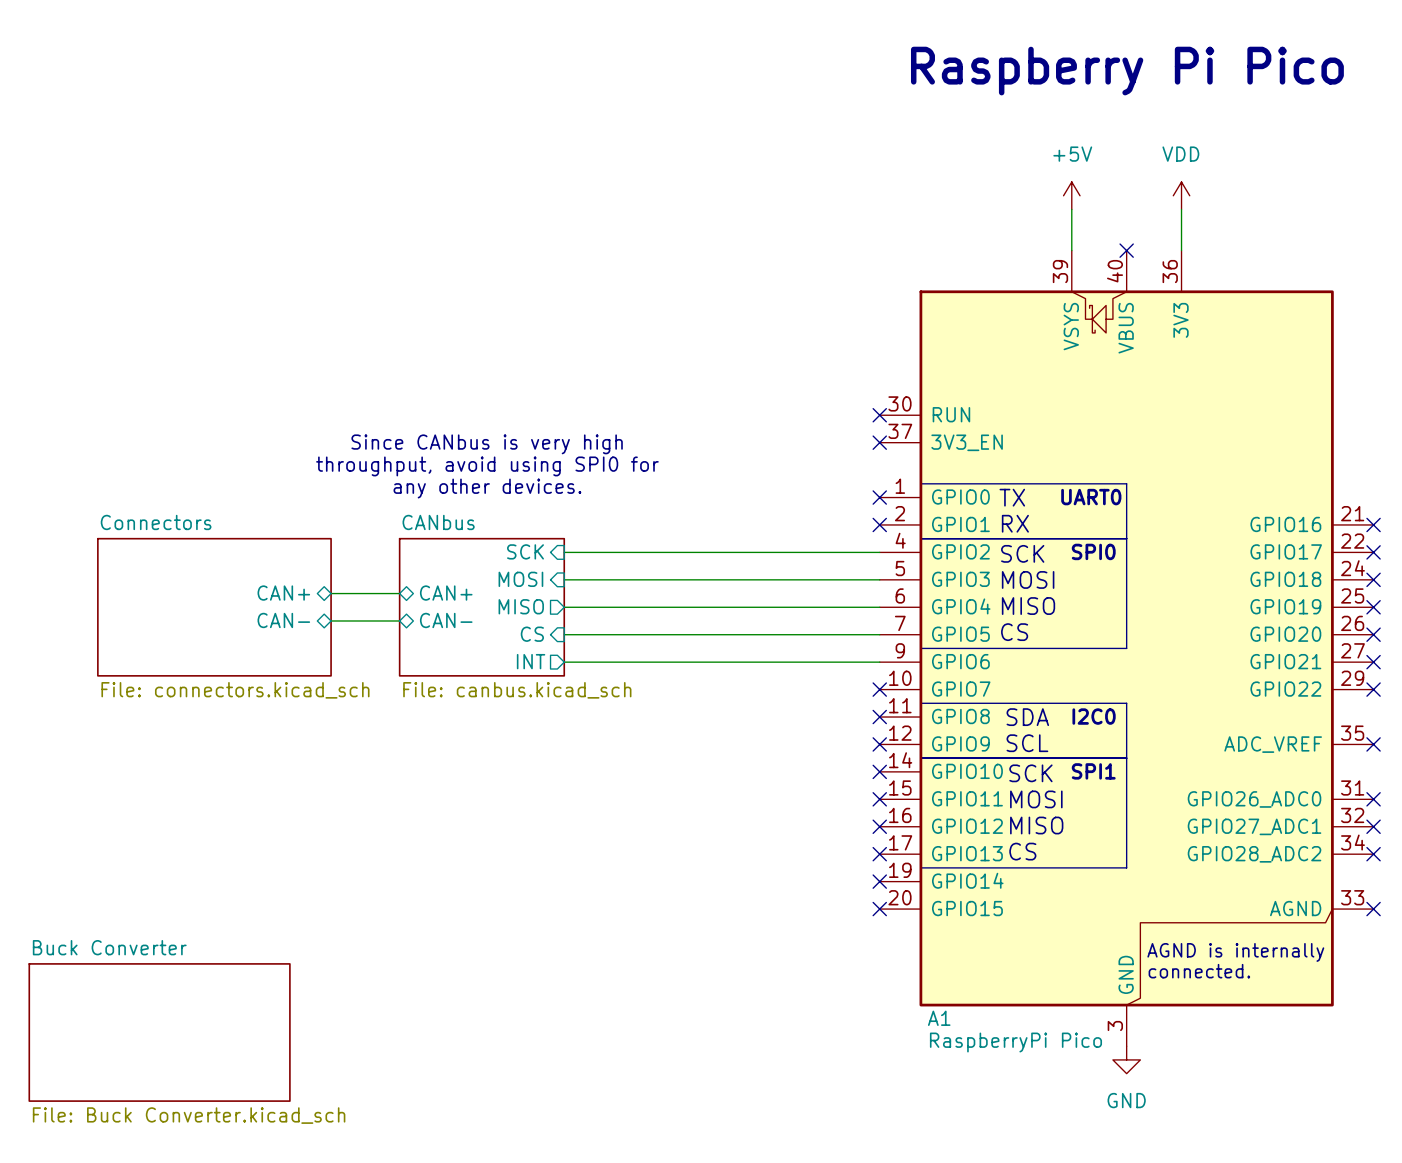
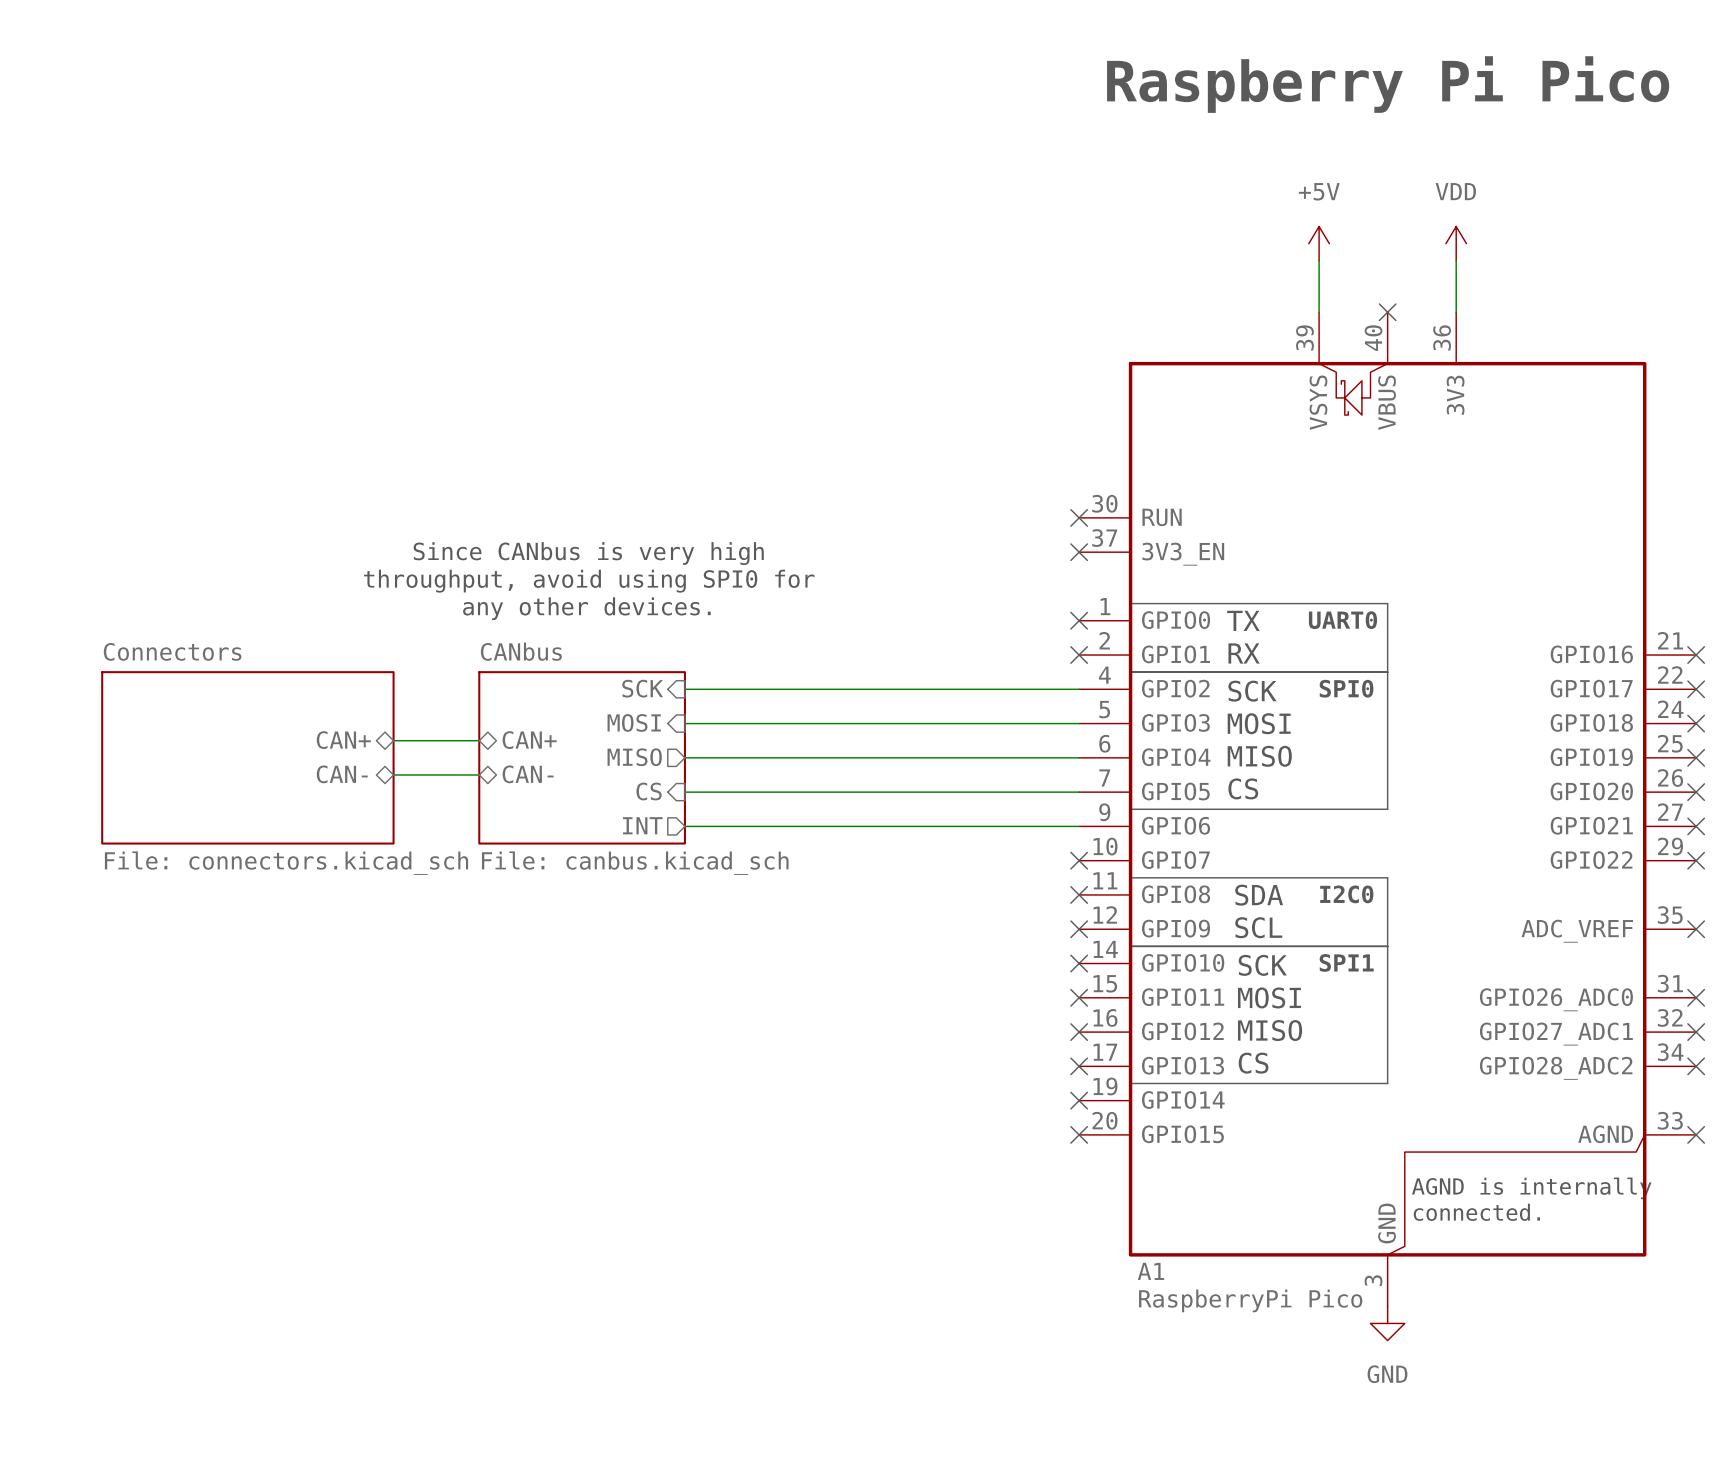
sheet Buck Converter: File: Buck Converter.kicad_sch (159, 1032) -> none

